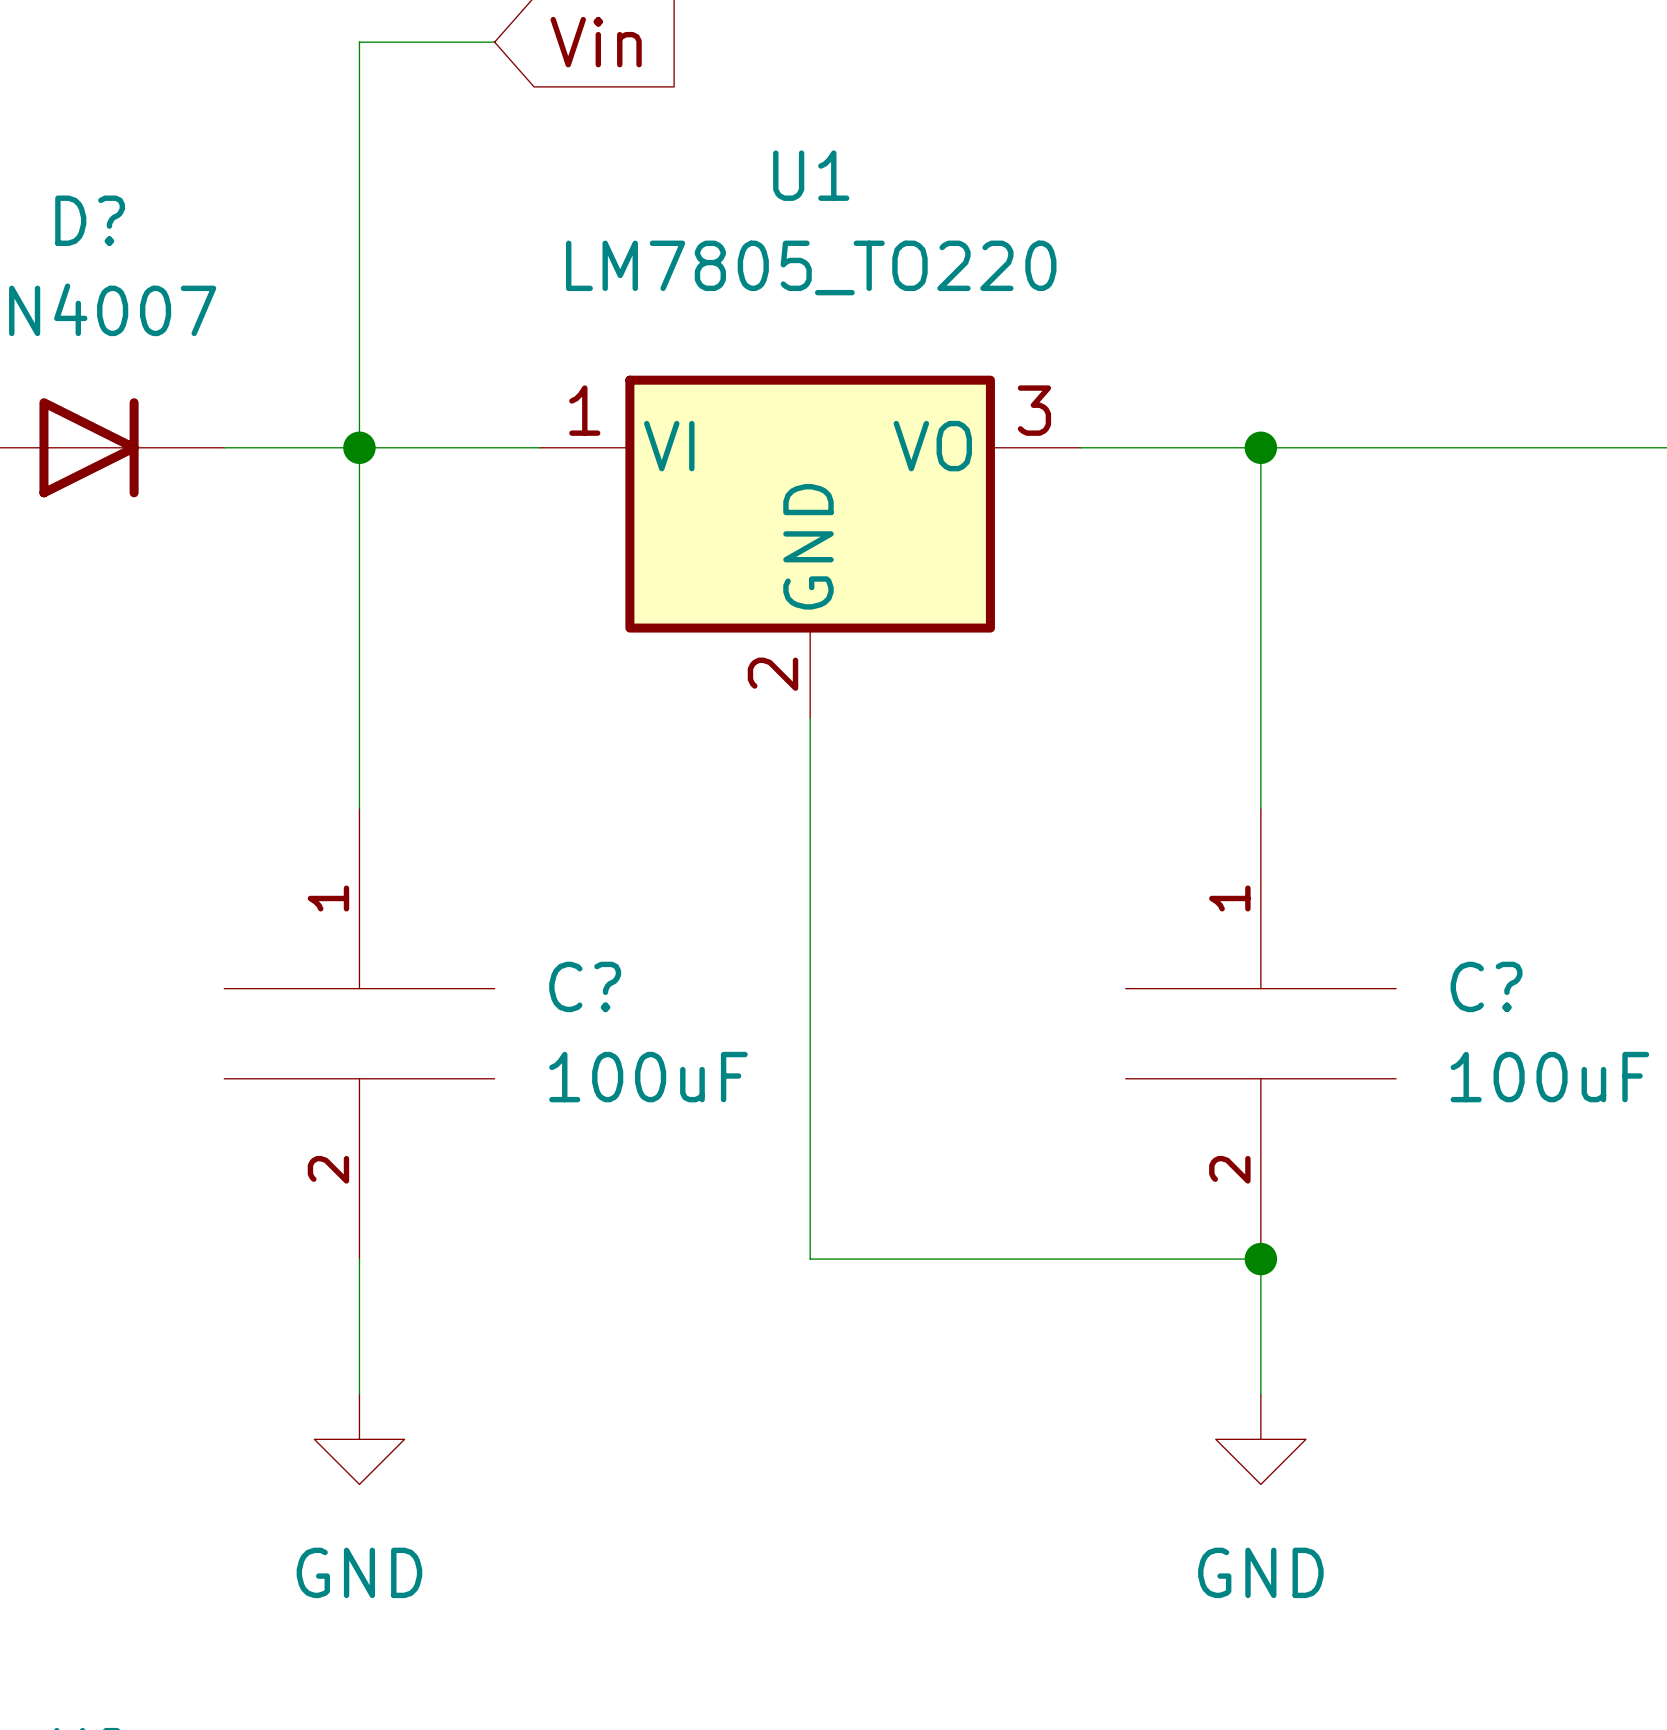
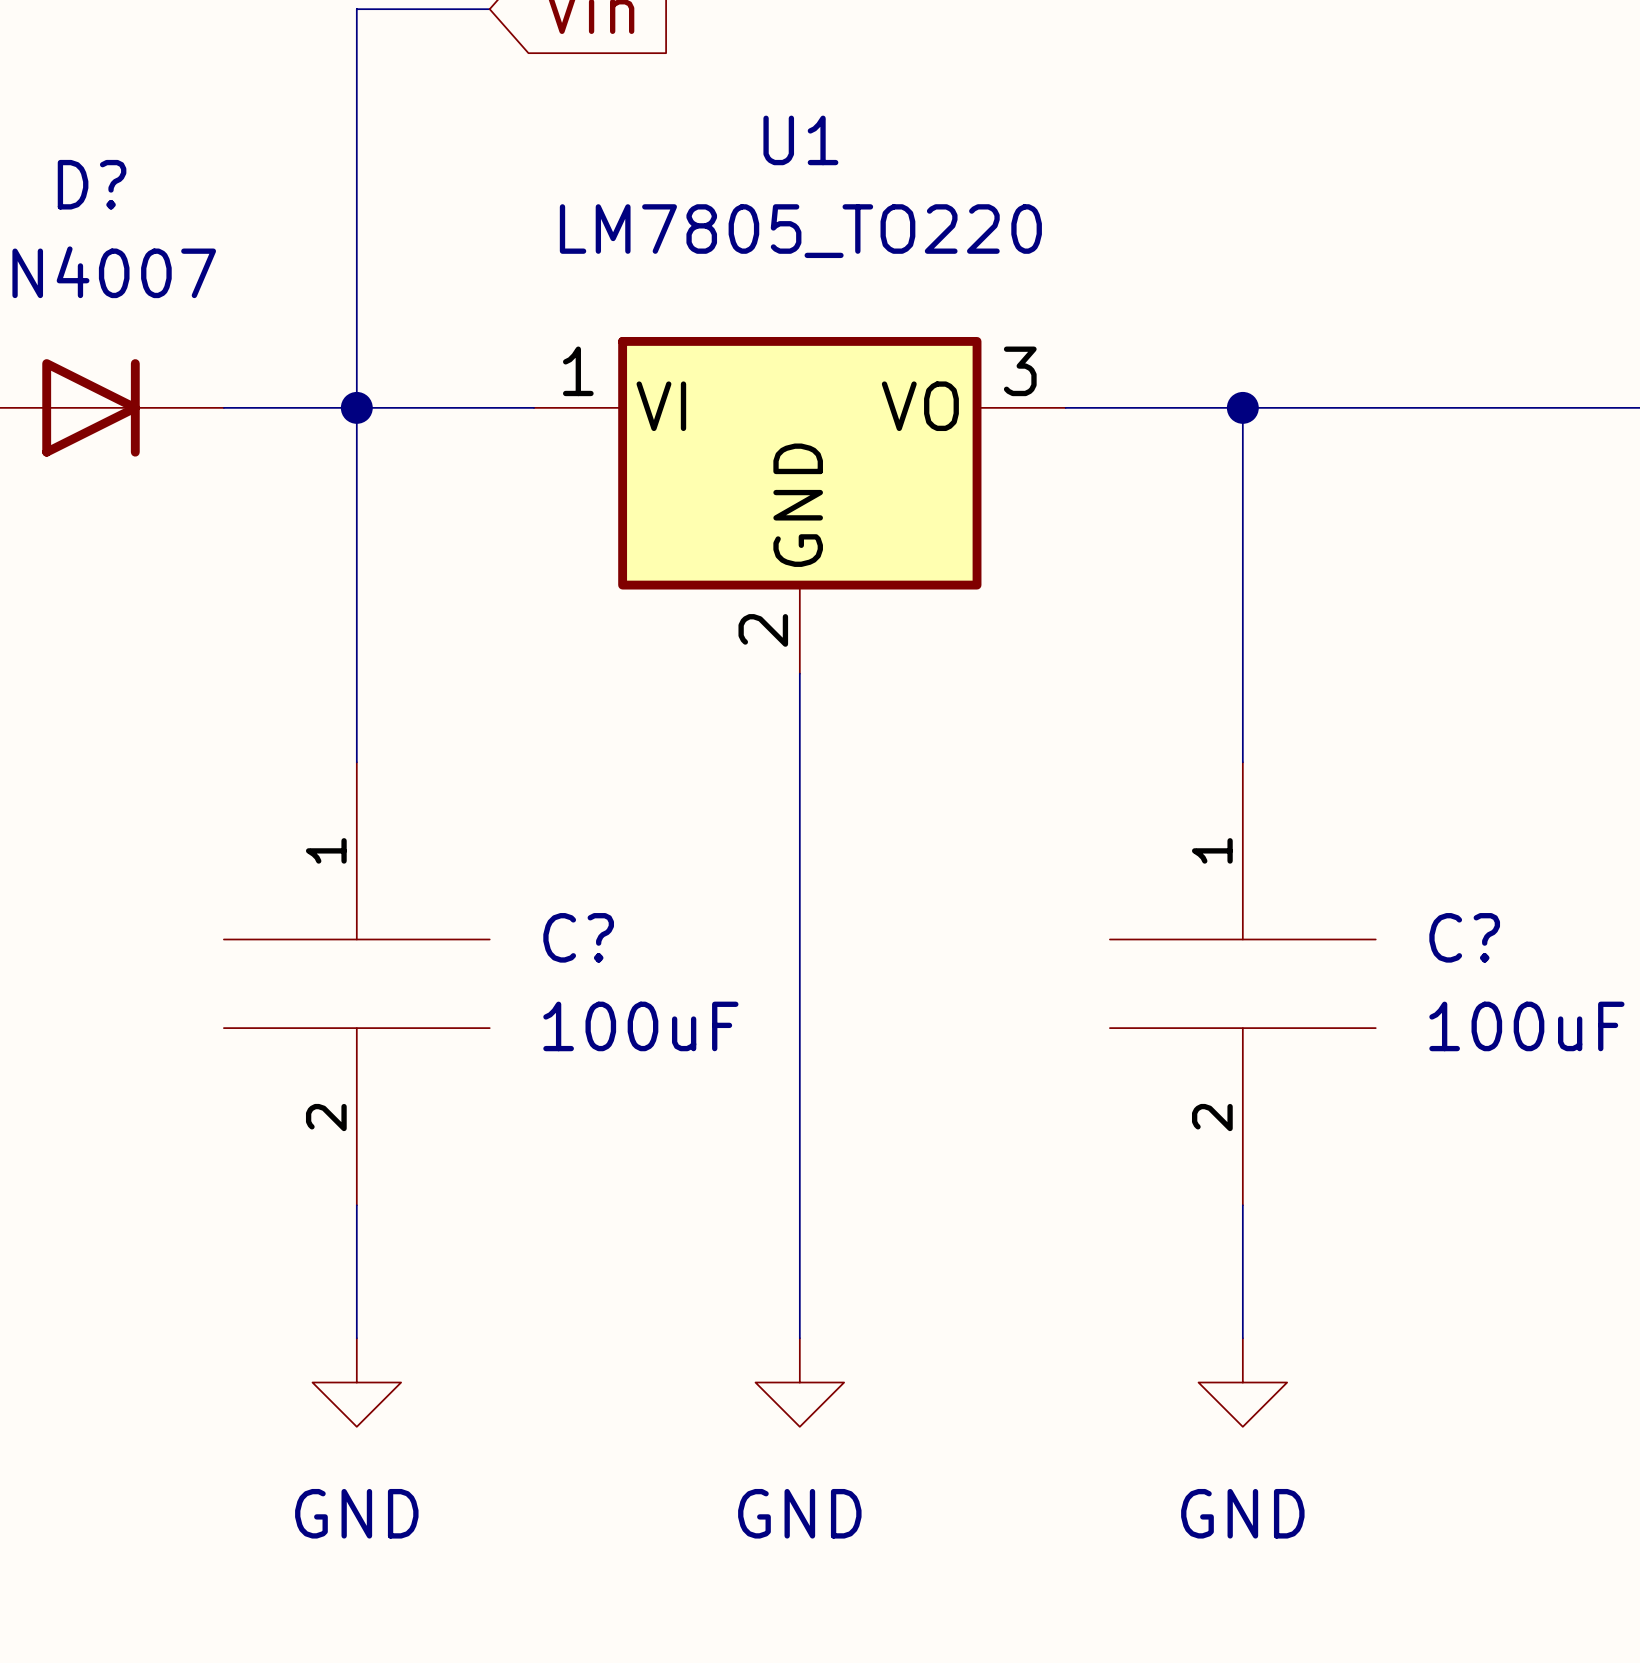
wire: (810, 1259) (1260, 1259) -> (799, 1205) (799, 1338)
junction: (1260, 1259) -> none
power symbol: none -> GND (799, 1382)

